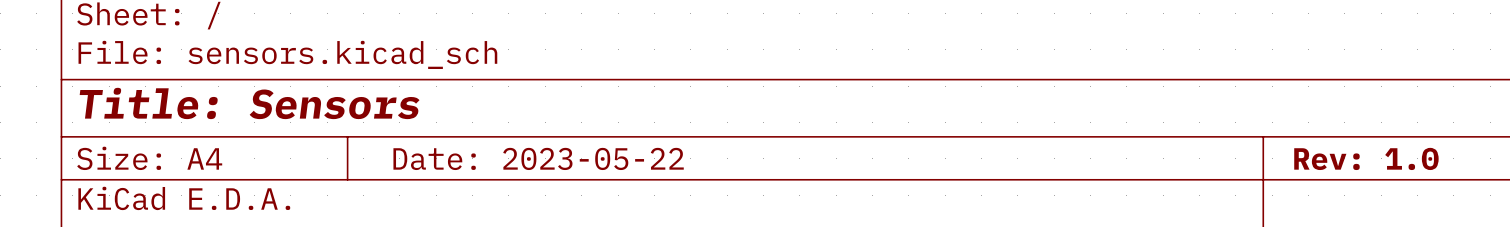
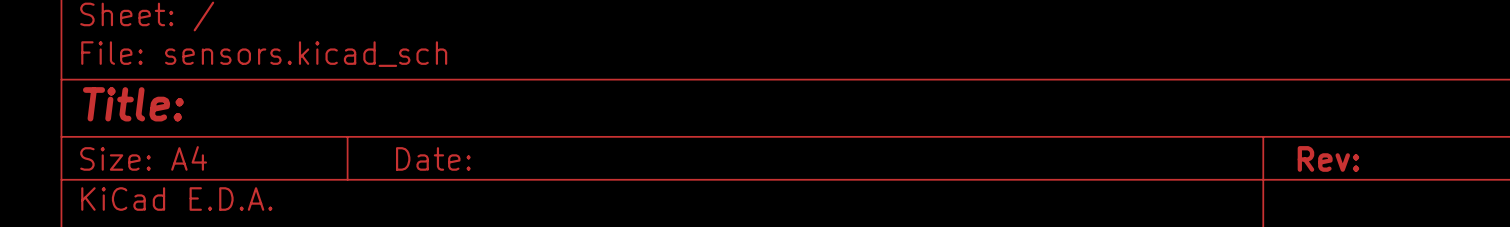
title block: Title: Sensors (249, 103) -> Title: (133, 104)
title block: Date: 2023-05-22 (538, 158) -> Date: (433, 158)
title block: Rev: 1.0 (1366, 158) -> Rev: (1328, 158)

